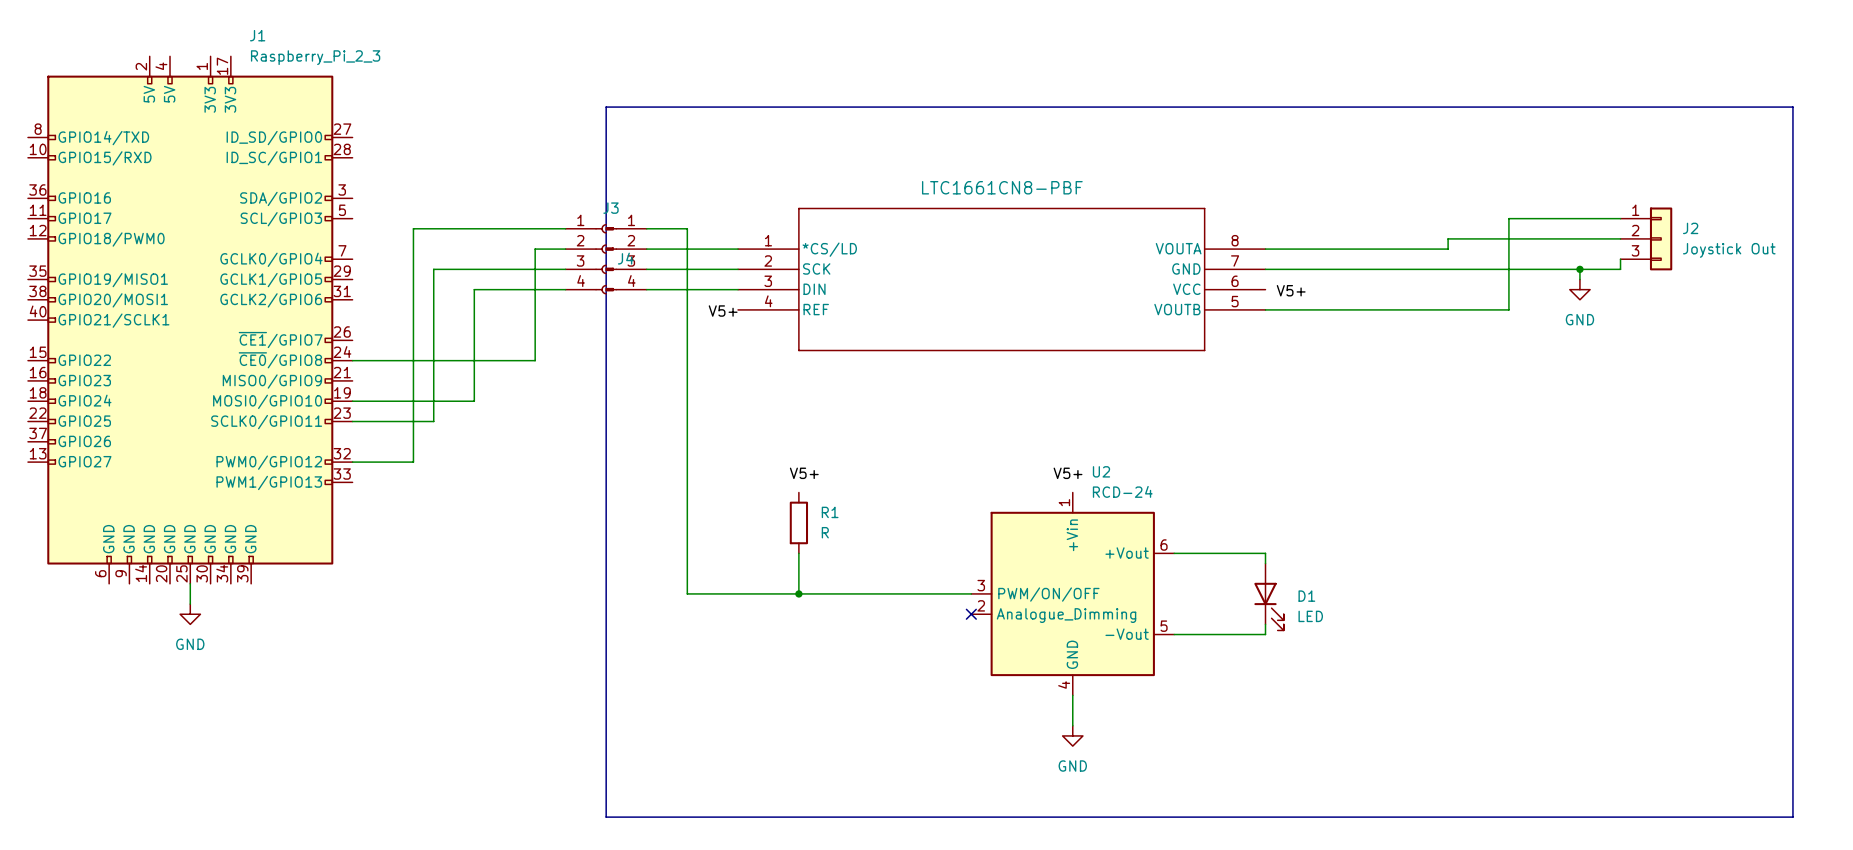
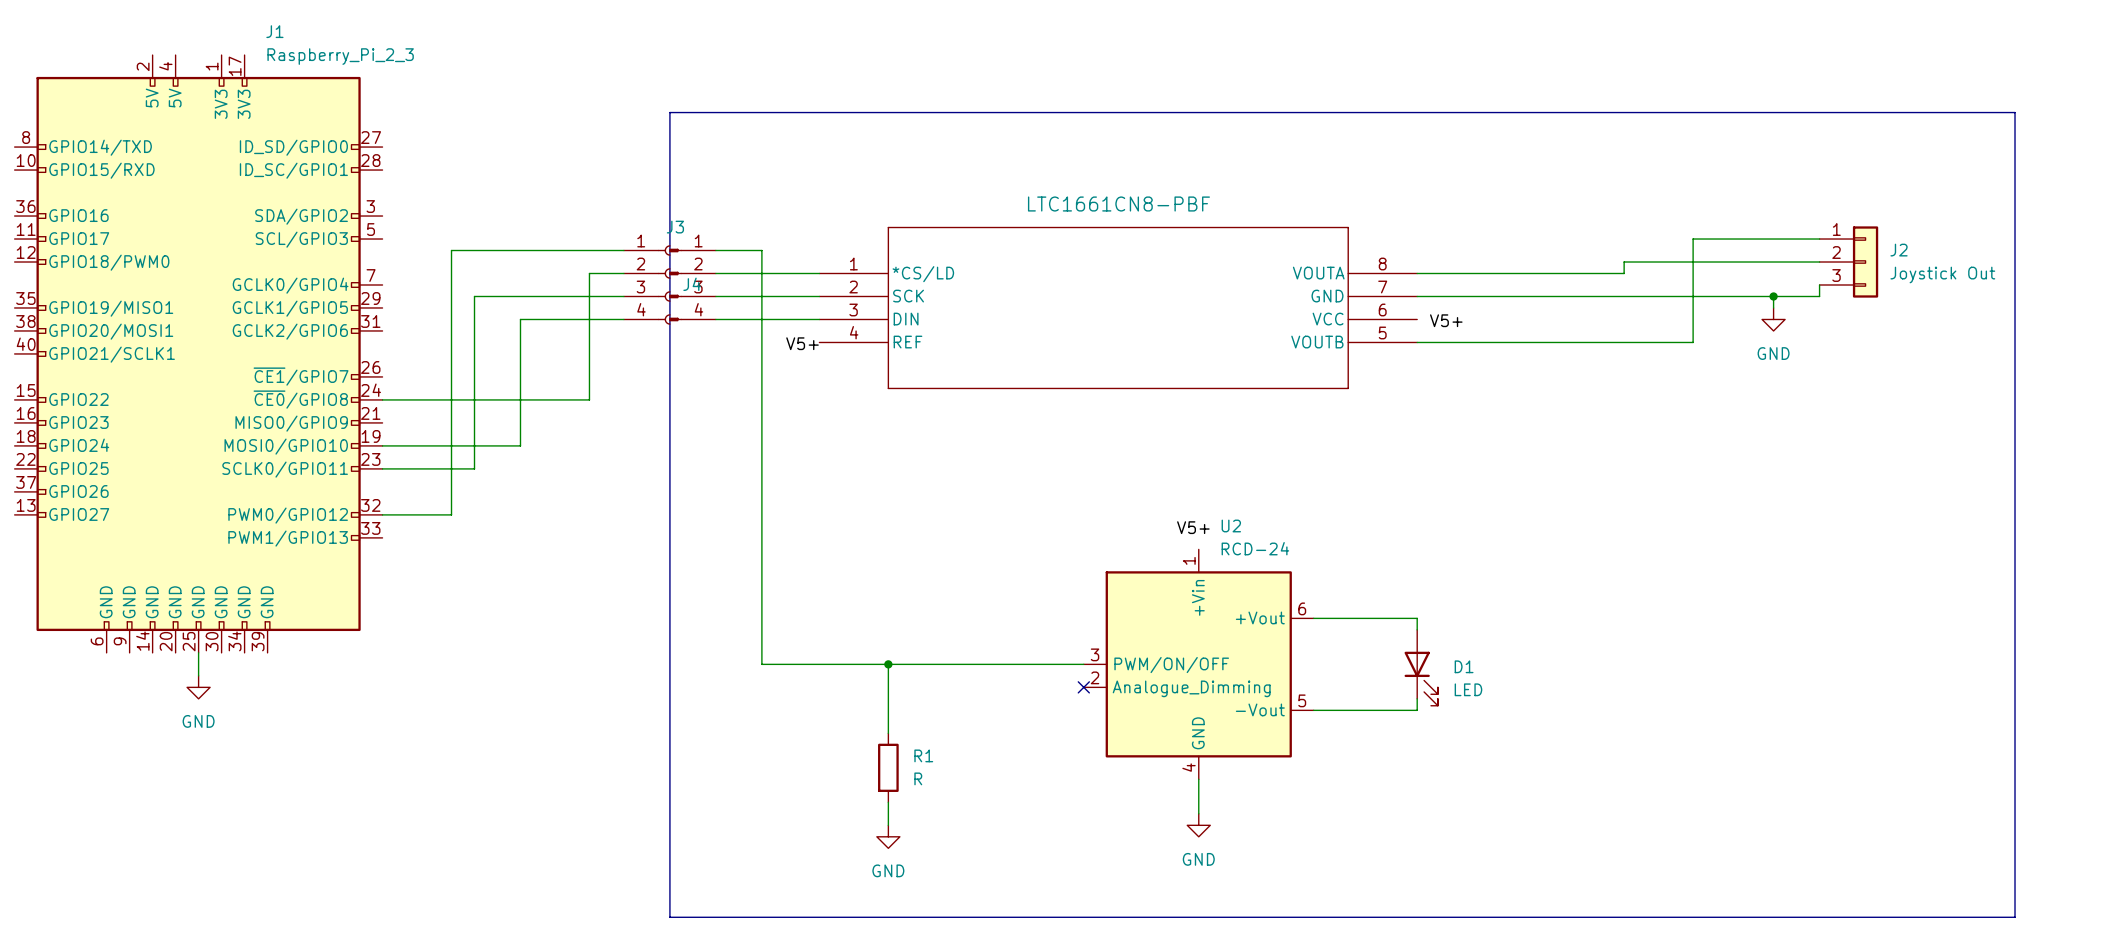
label: V5+ (804, 473) -> none
R1 position: (798, 522) -> (888, 767)
wire: (798, 553) (798, 593) -> (888, 733) (888, 664)
wire: none -> (888, 802) (888, 825)
power symbol: none -> GND (888, 836)

